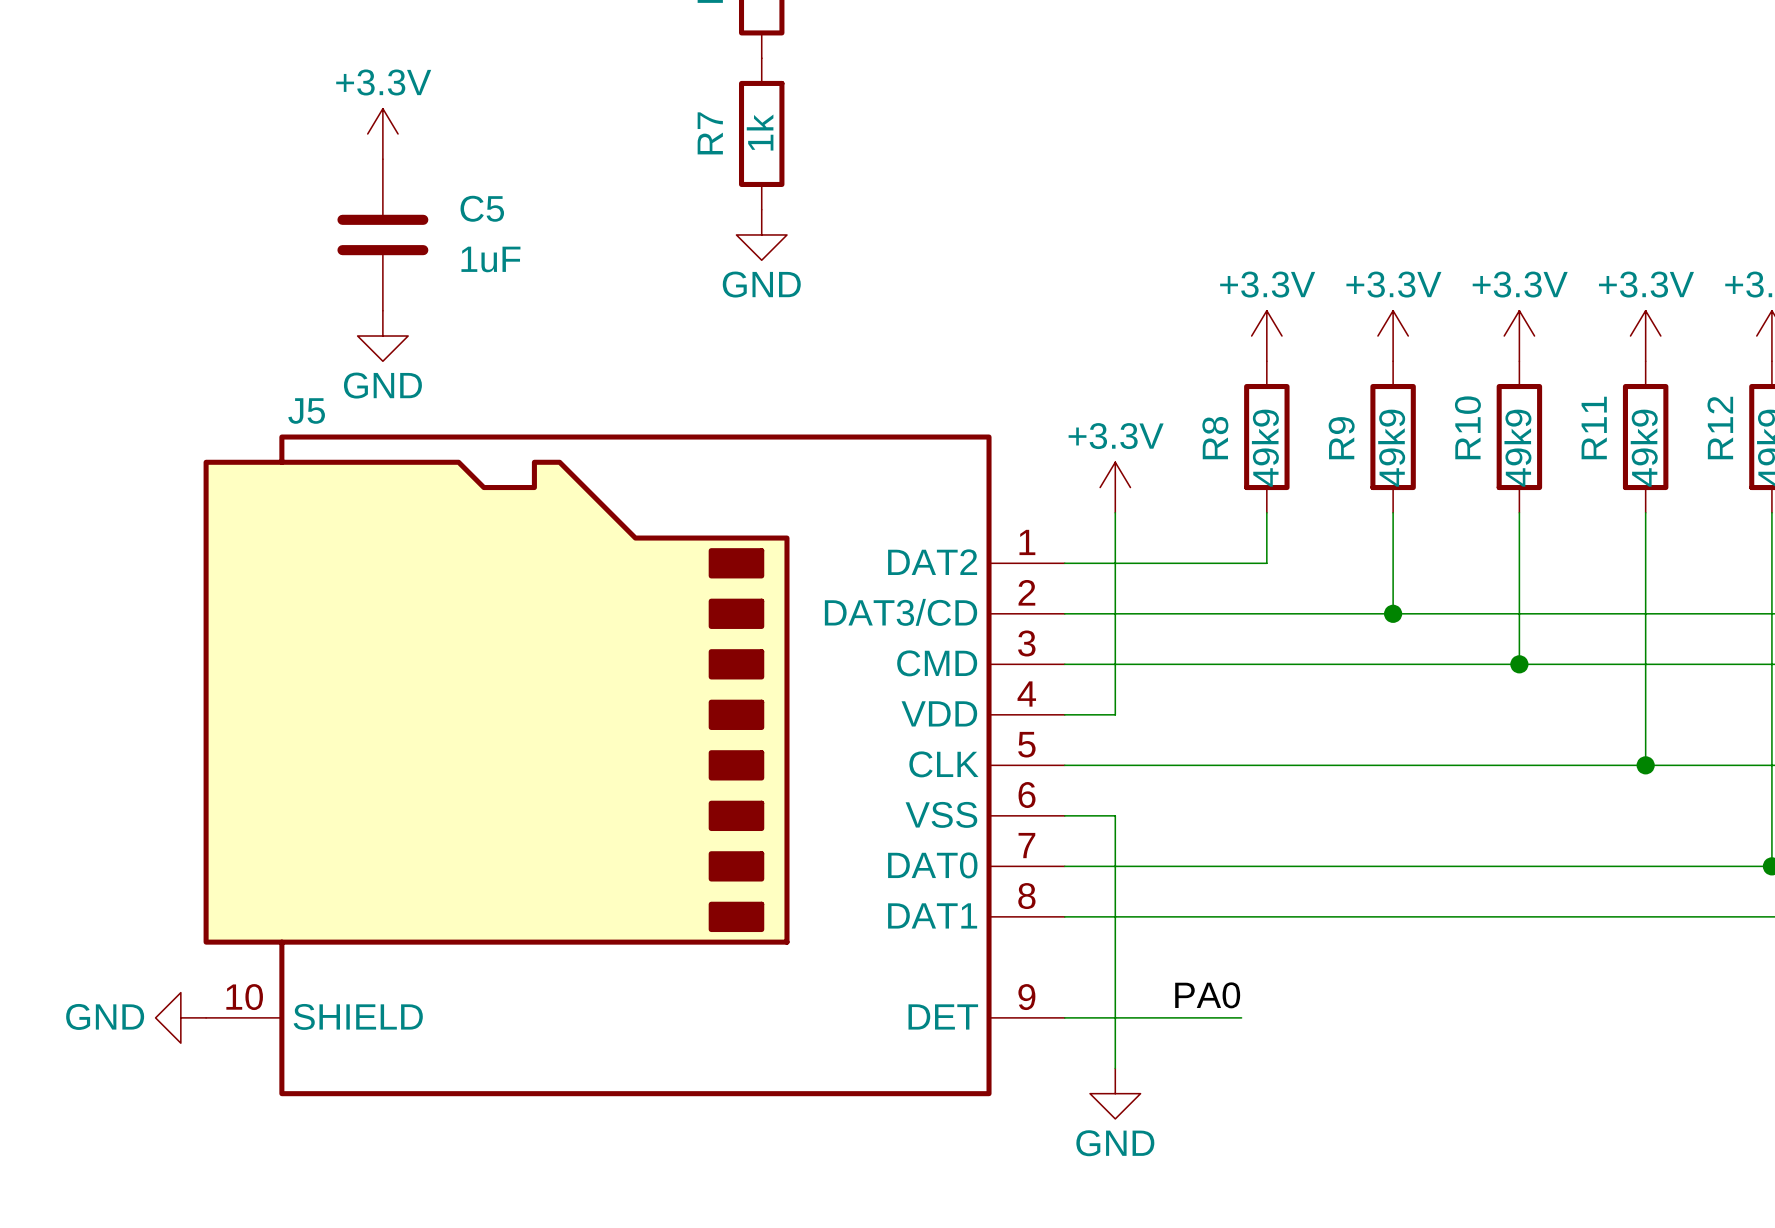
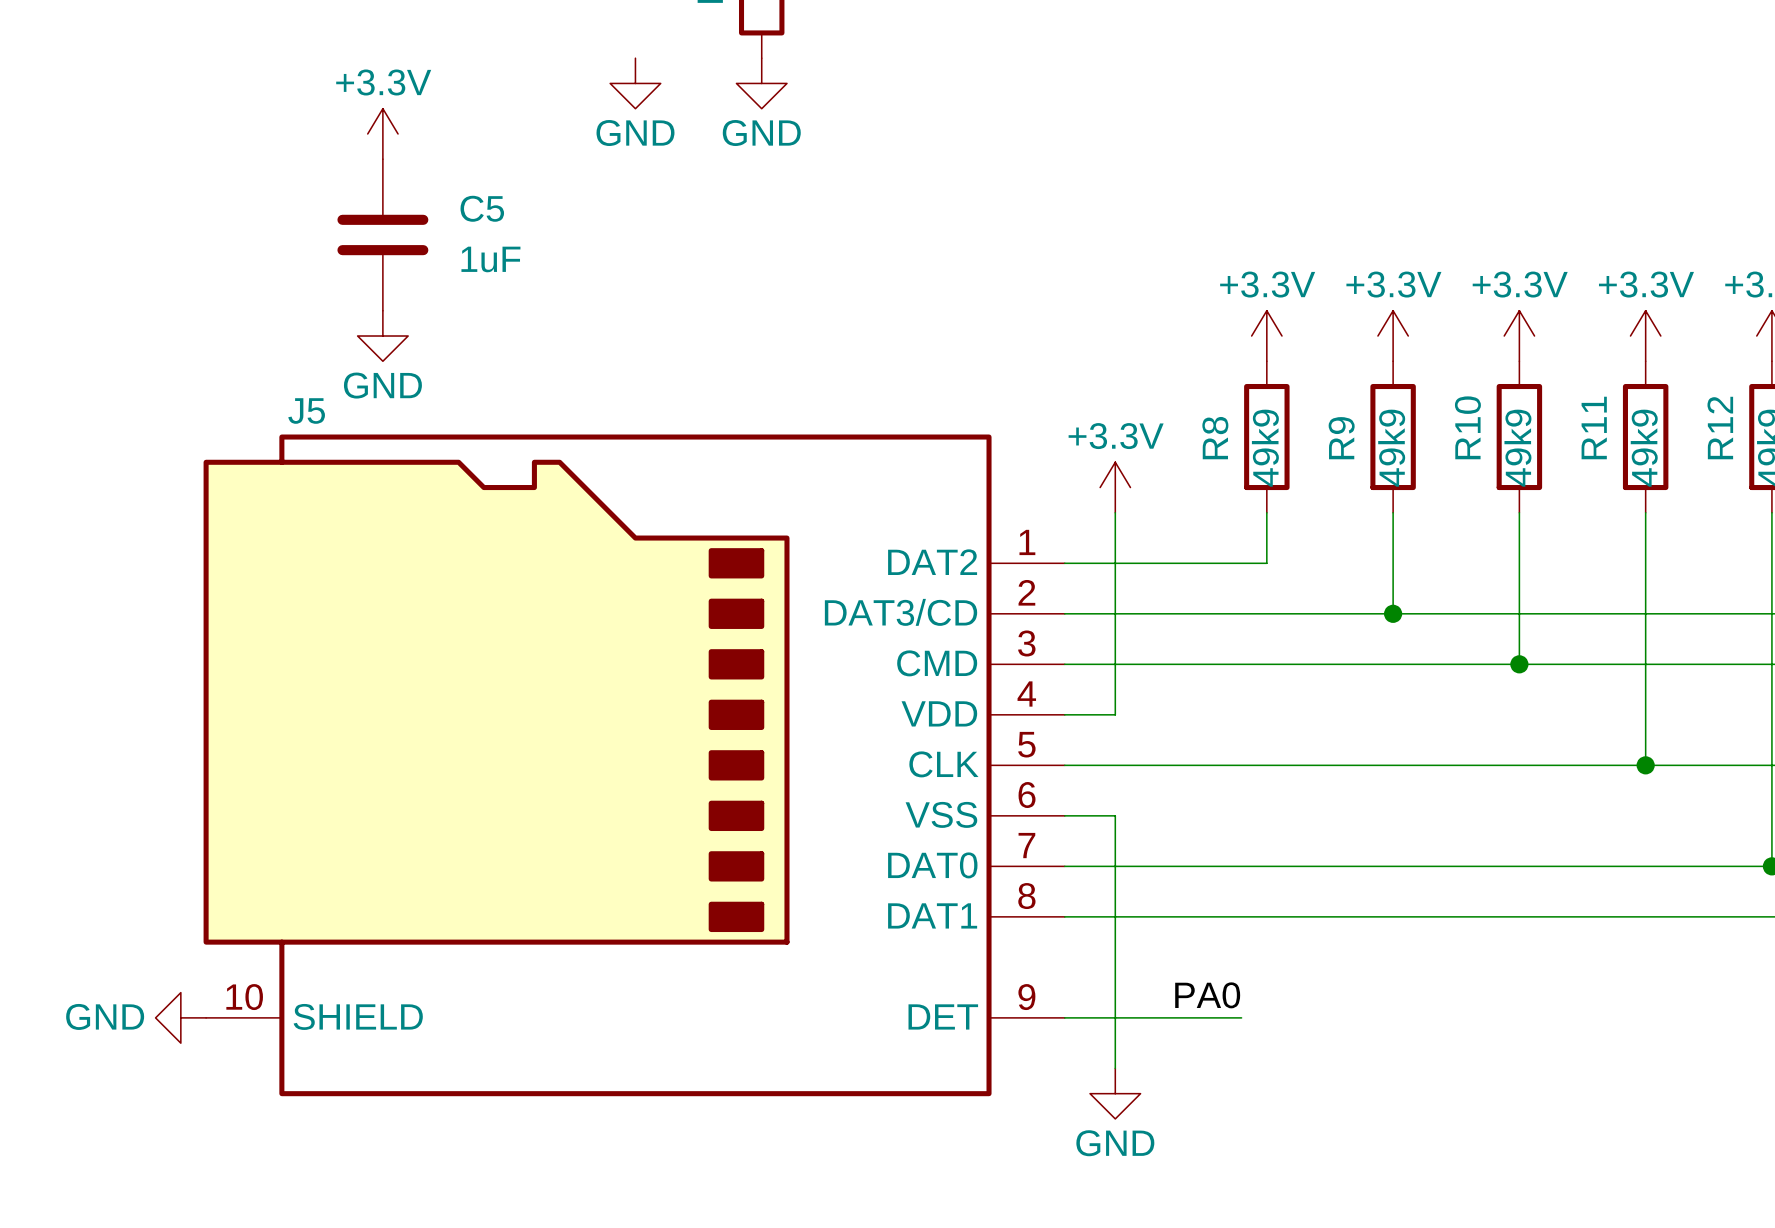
power symbol: none -> GND (635, 83)
power symbol: none -> GND (761, 83)
R7: 1k (761, 133) -> none
power symbol: GND (761, 234) -> none

